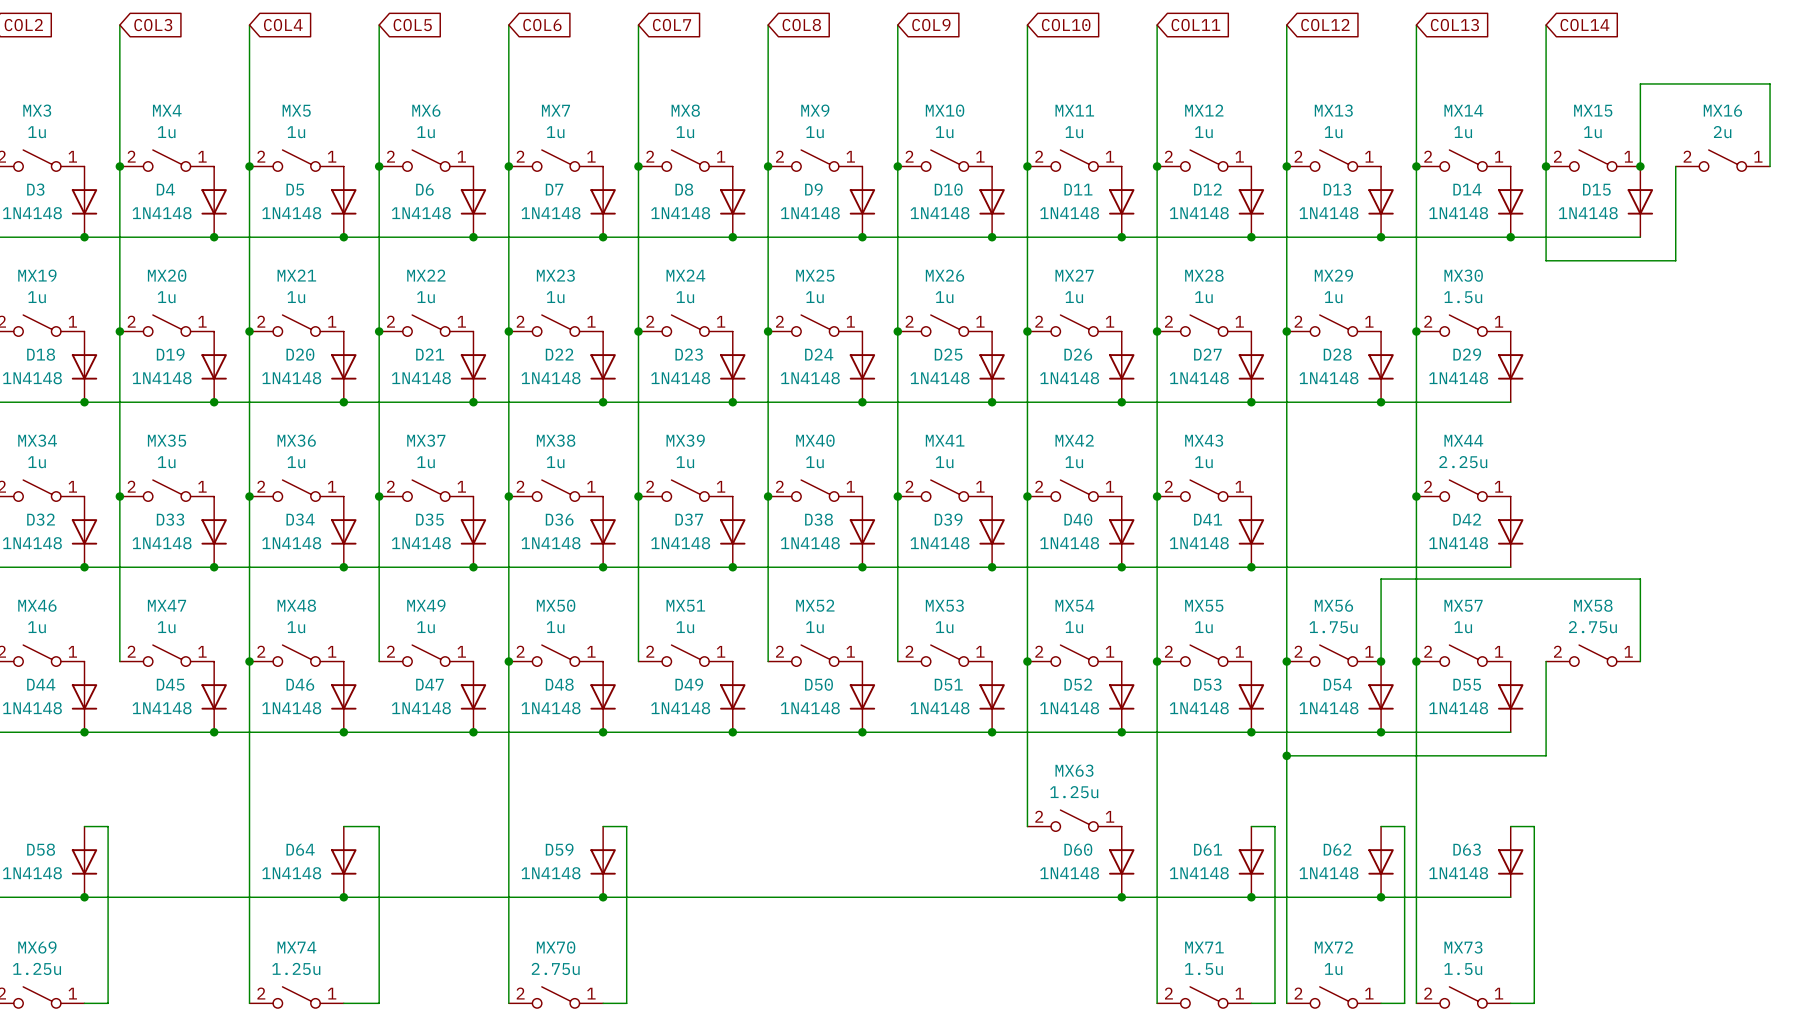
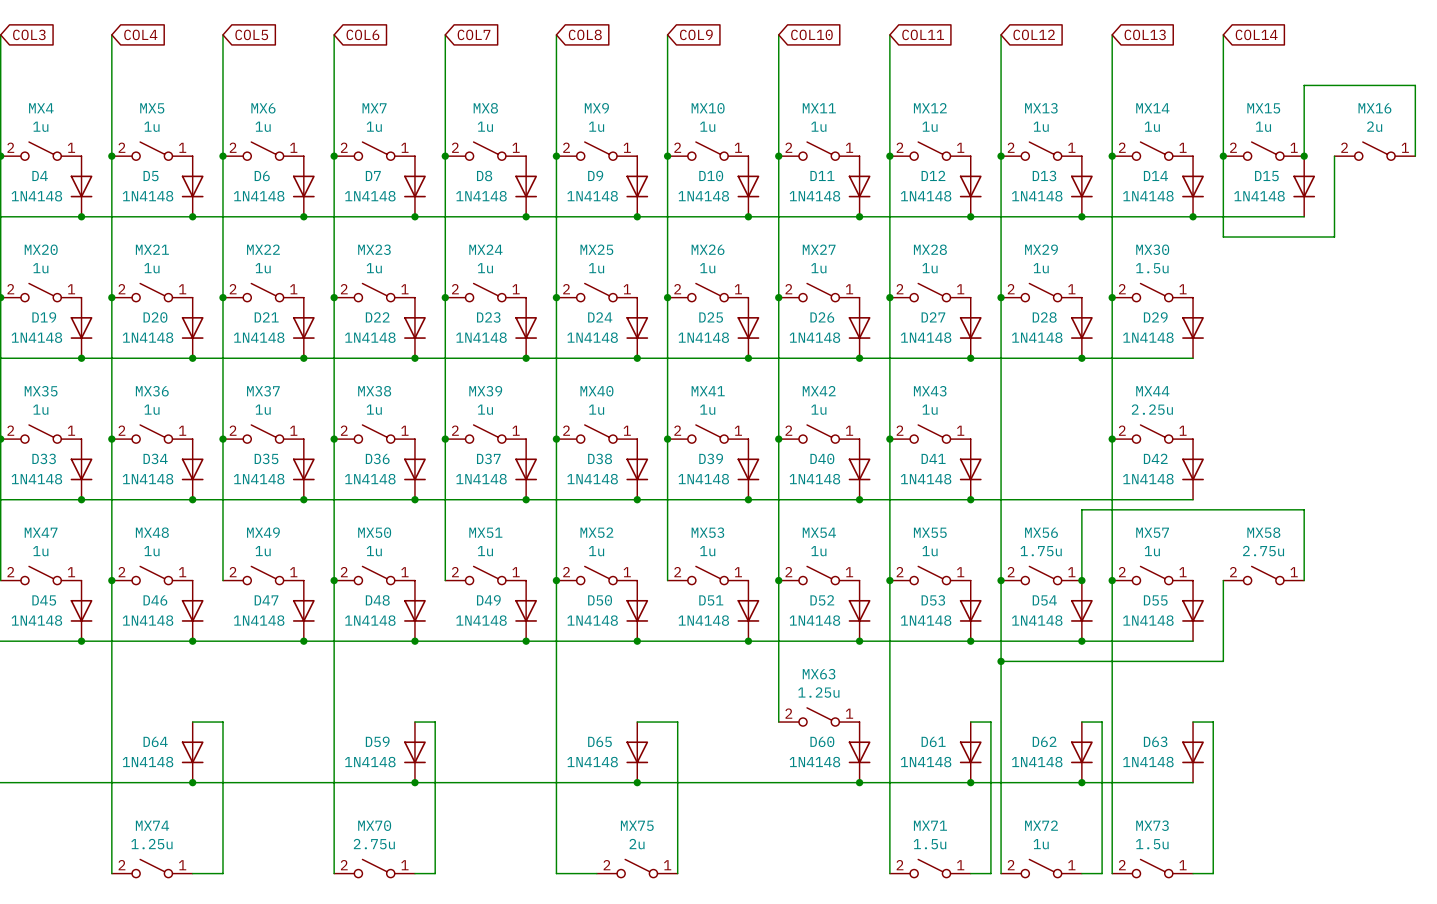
wire: none -> (556, 580) (556, 873) (596, 873)
junction: none -> (556, 580)
wire: none -> (637, 722) (677, 722) (677, 873)
D65: none -> 1N4148 (637, 752)
junction: none -> (637, 782)
MX75: none -> 2u (637, 868)

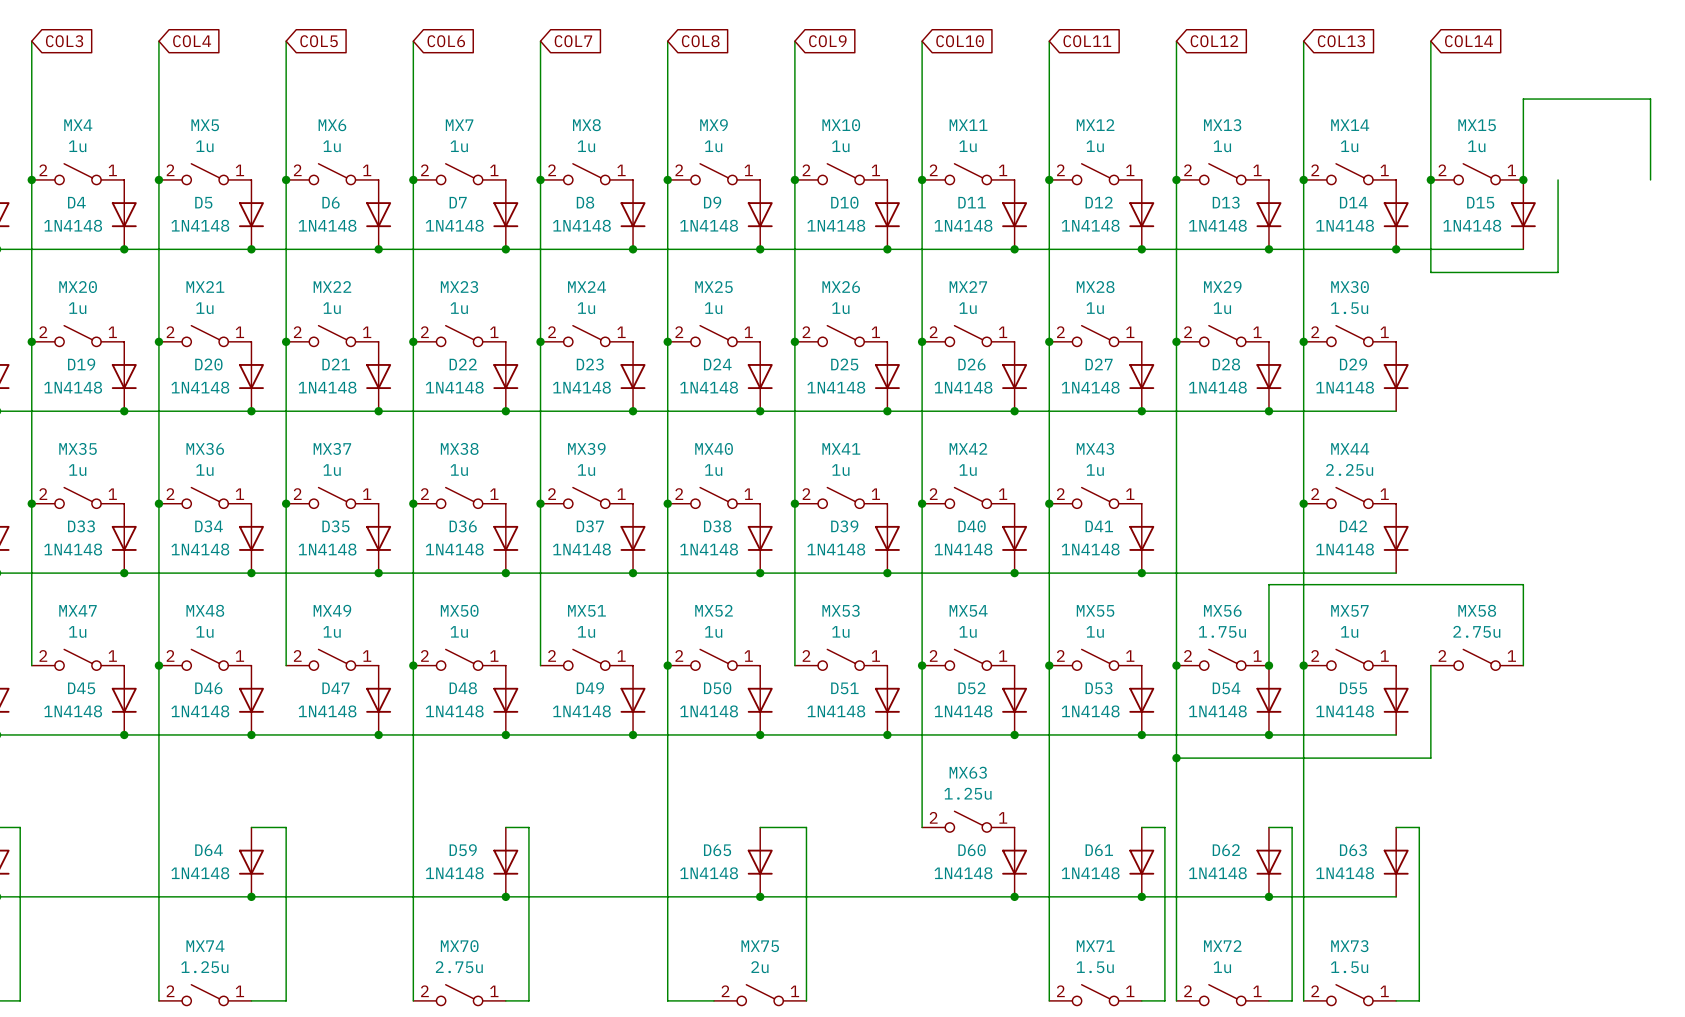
MX16: 2u (1374, 151) -> none

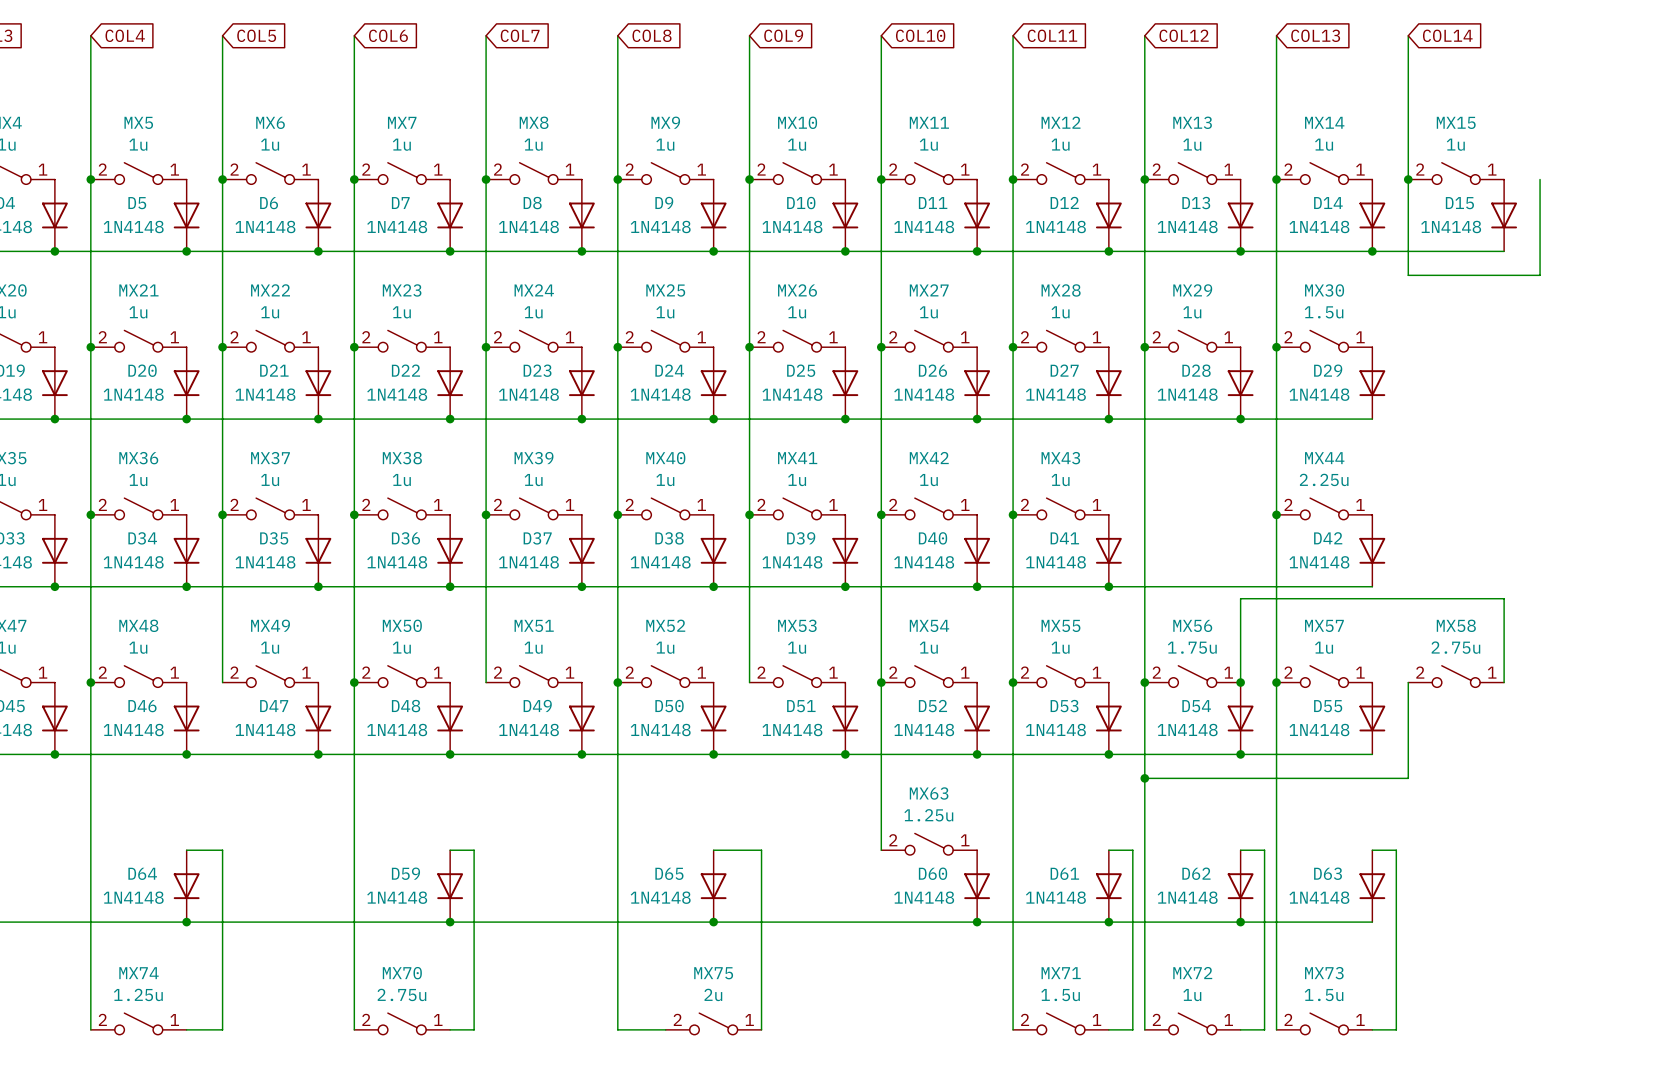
wire: (1523, 179) (1523, 99) (1650, 99) (1650, 179) -> none
junction: (1523, 179) -> none

